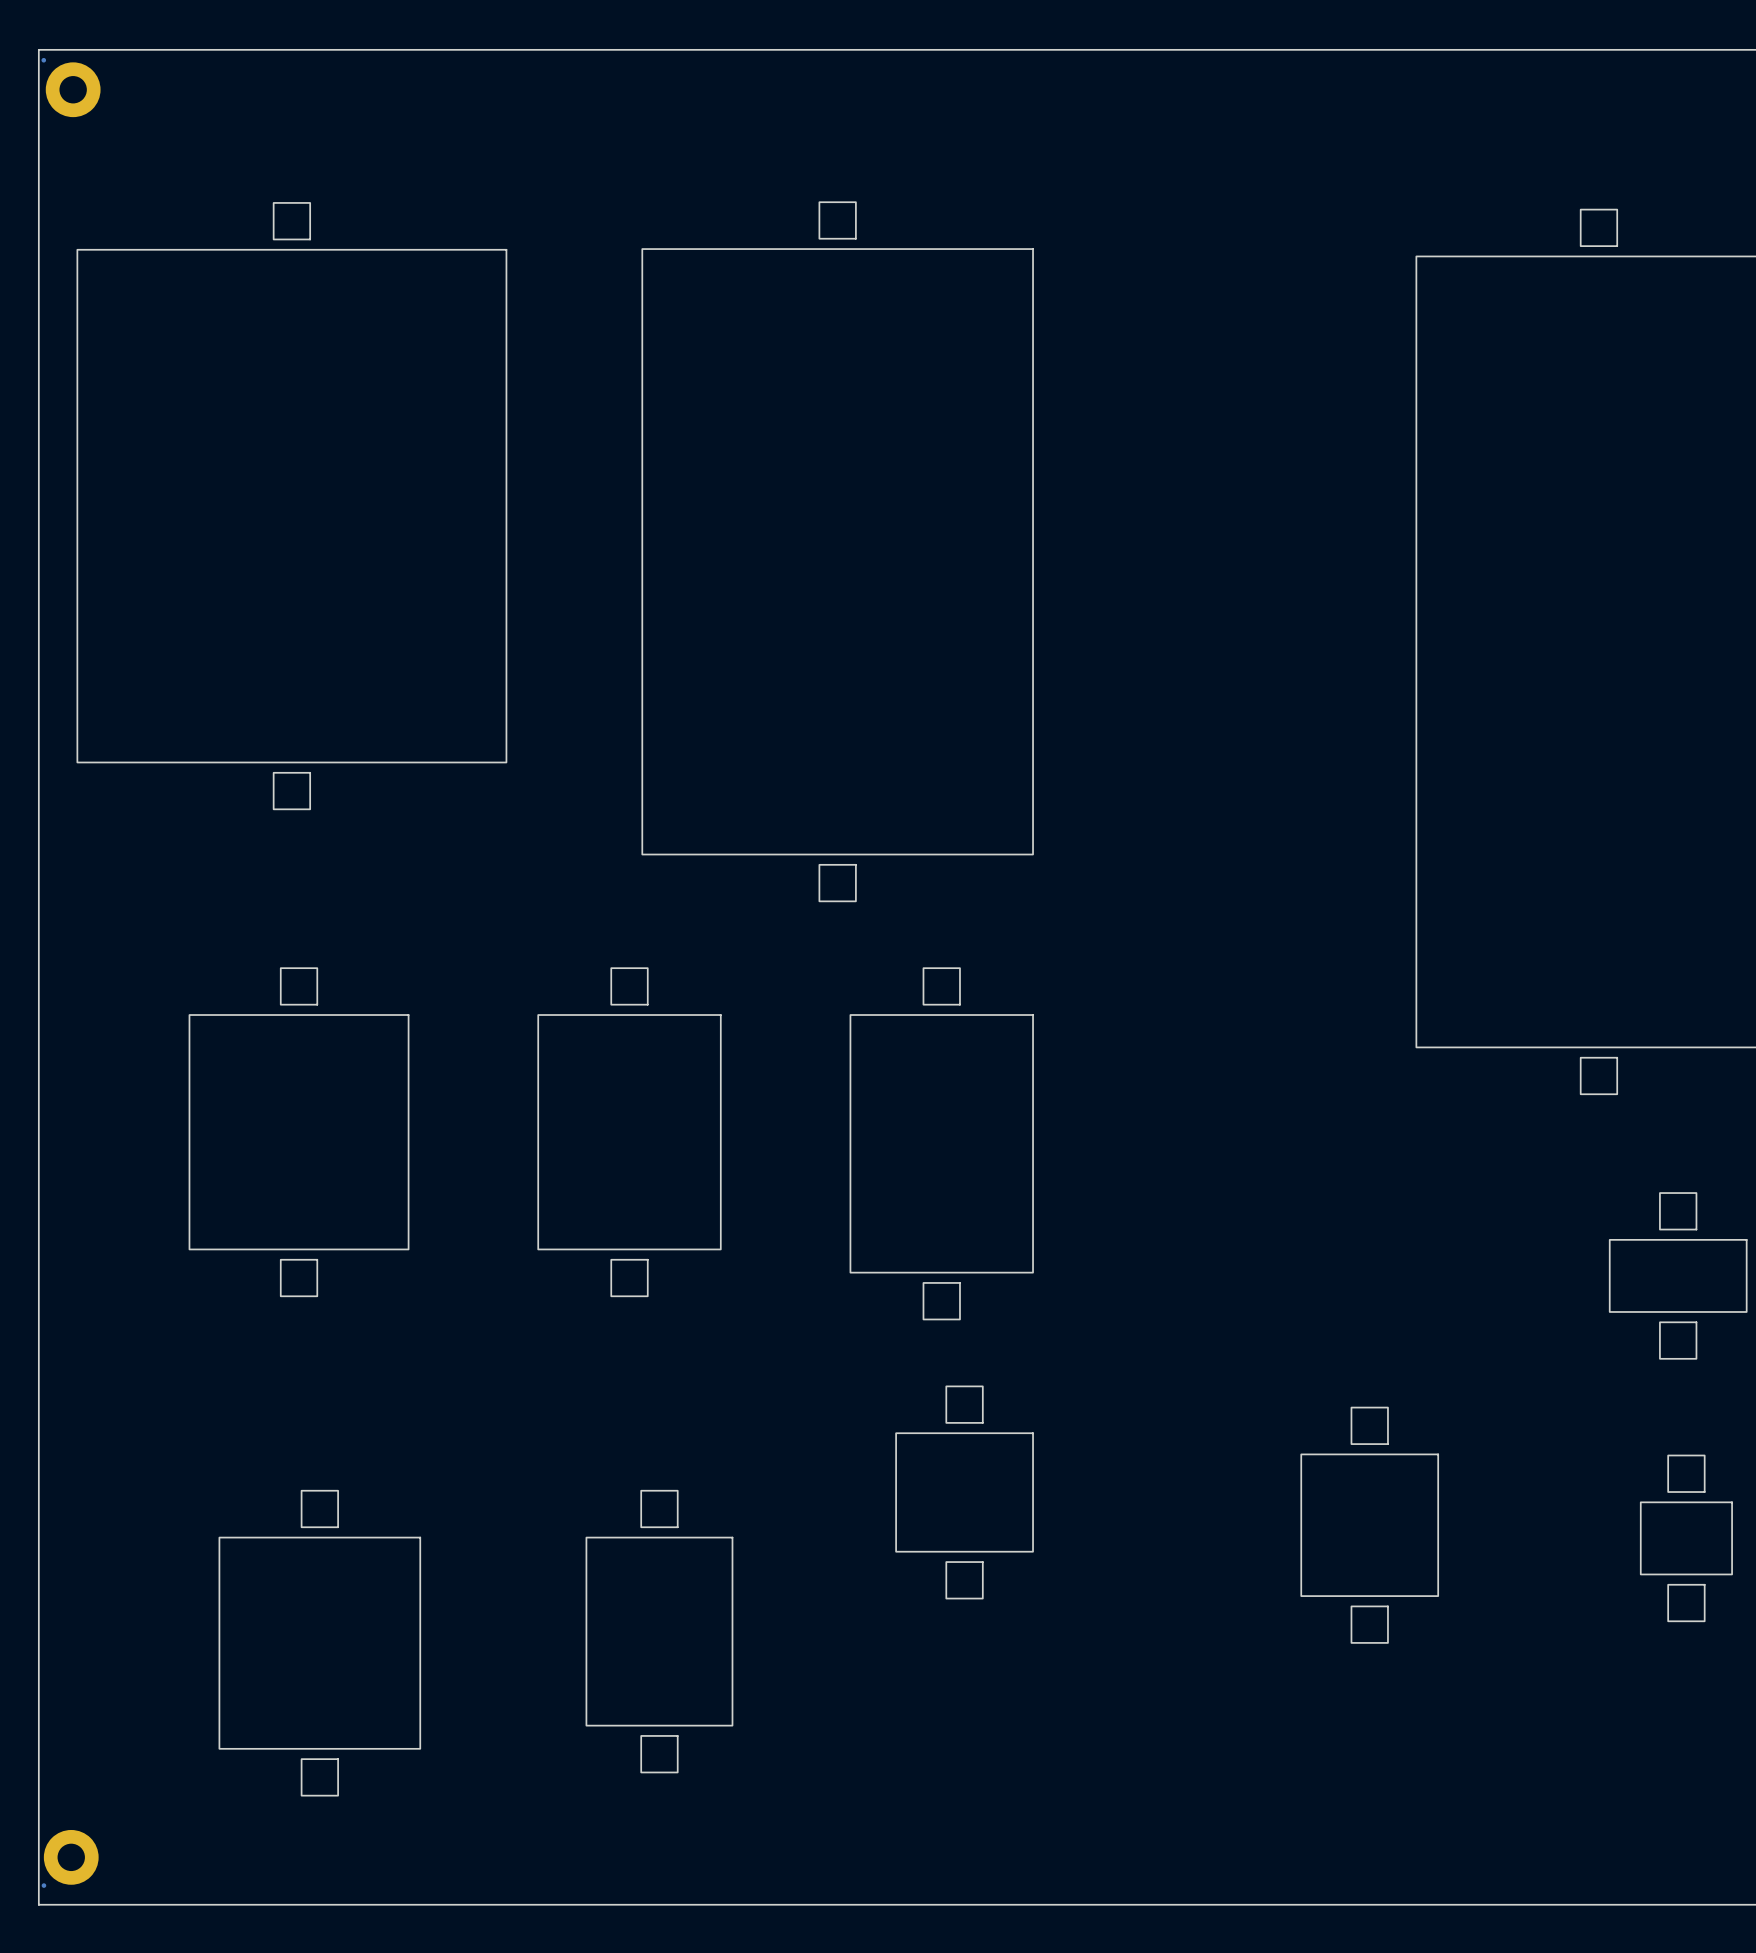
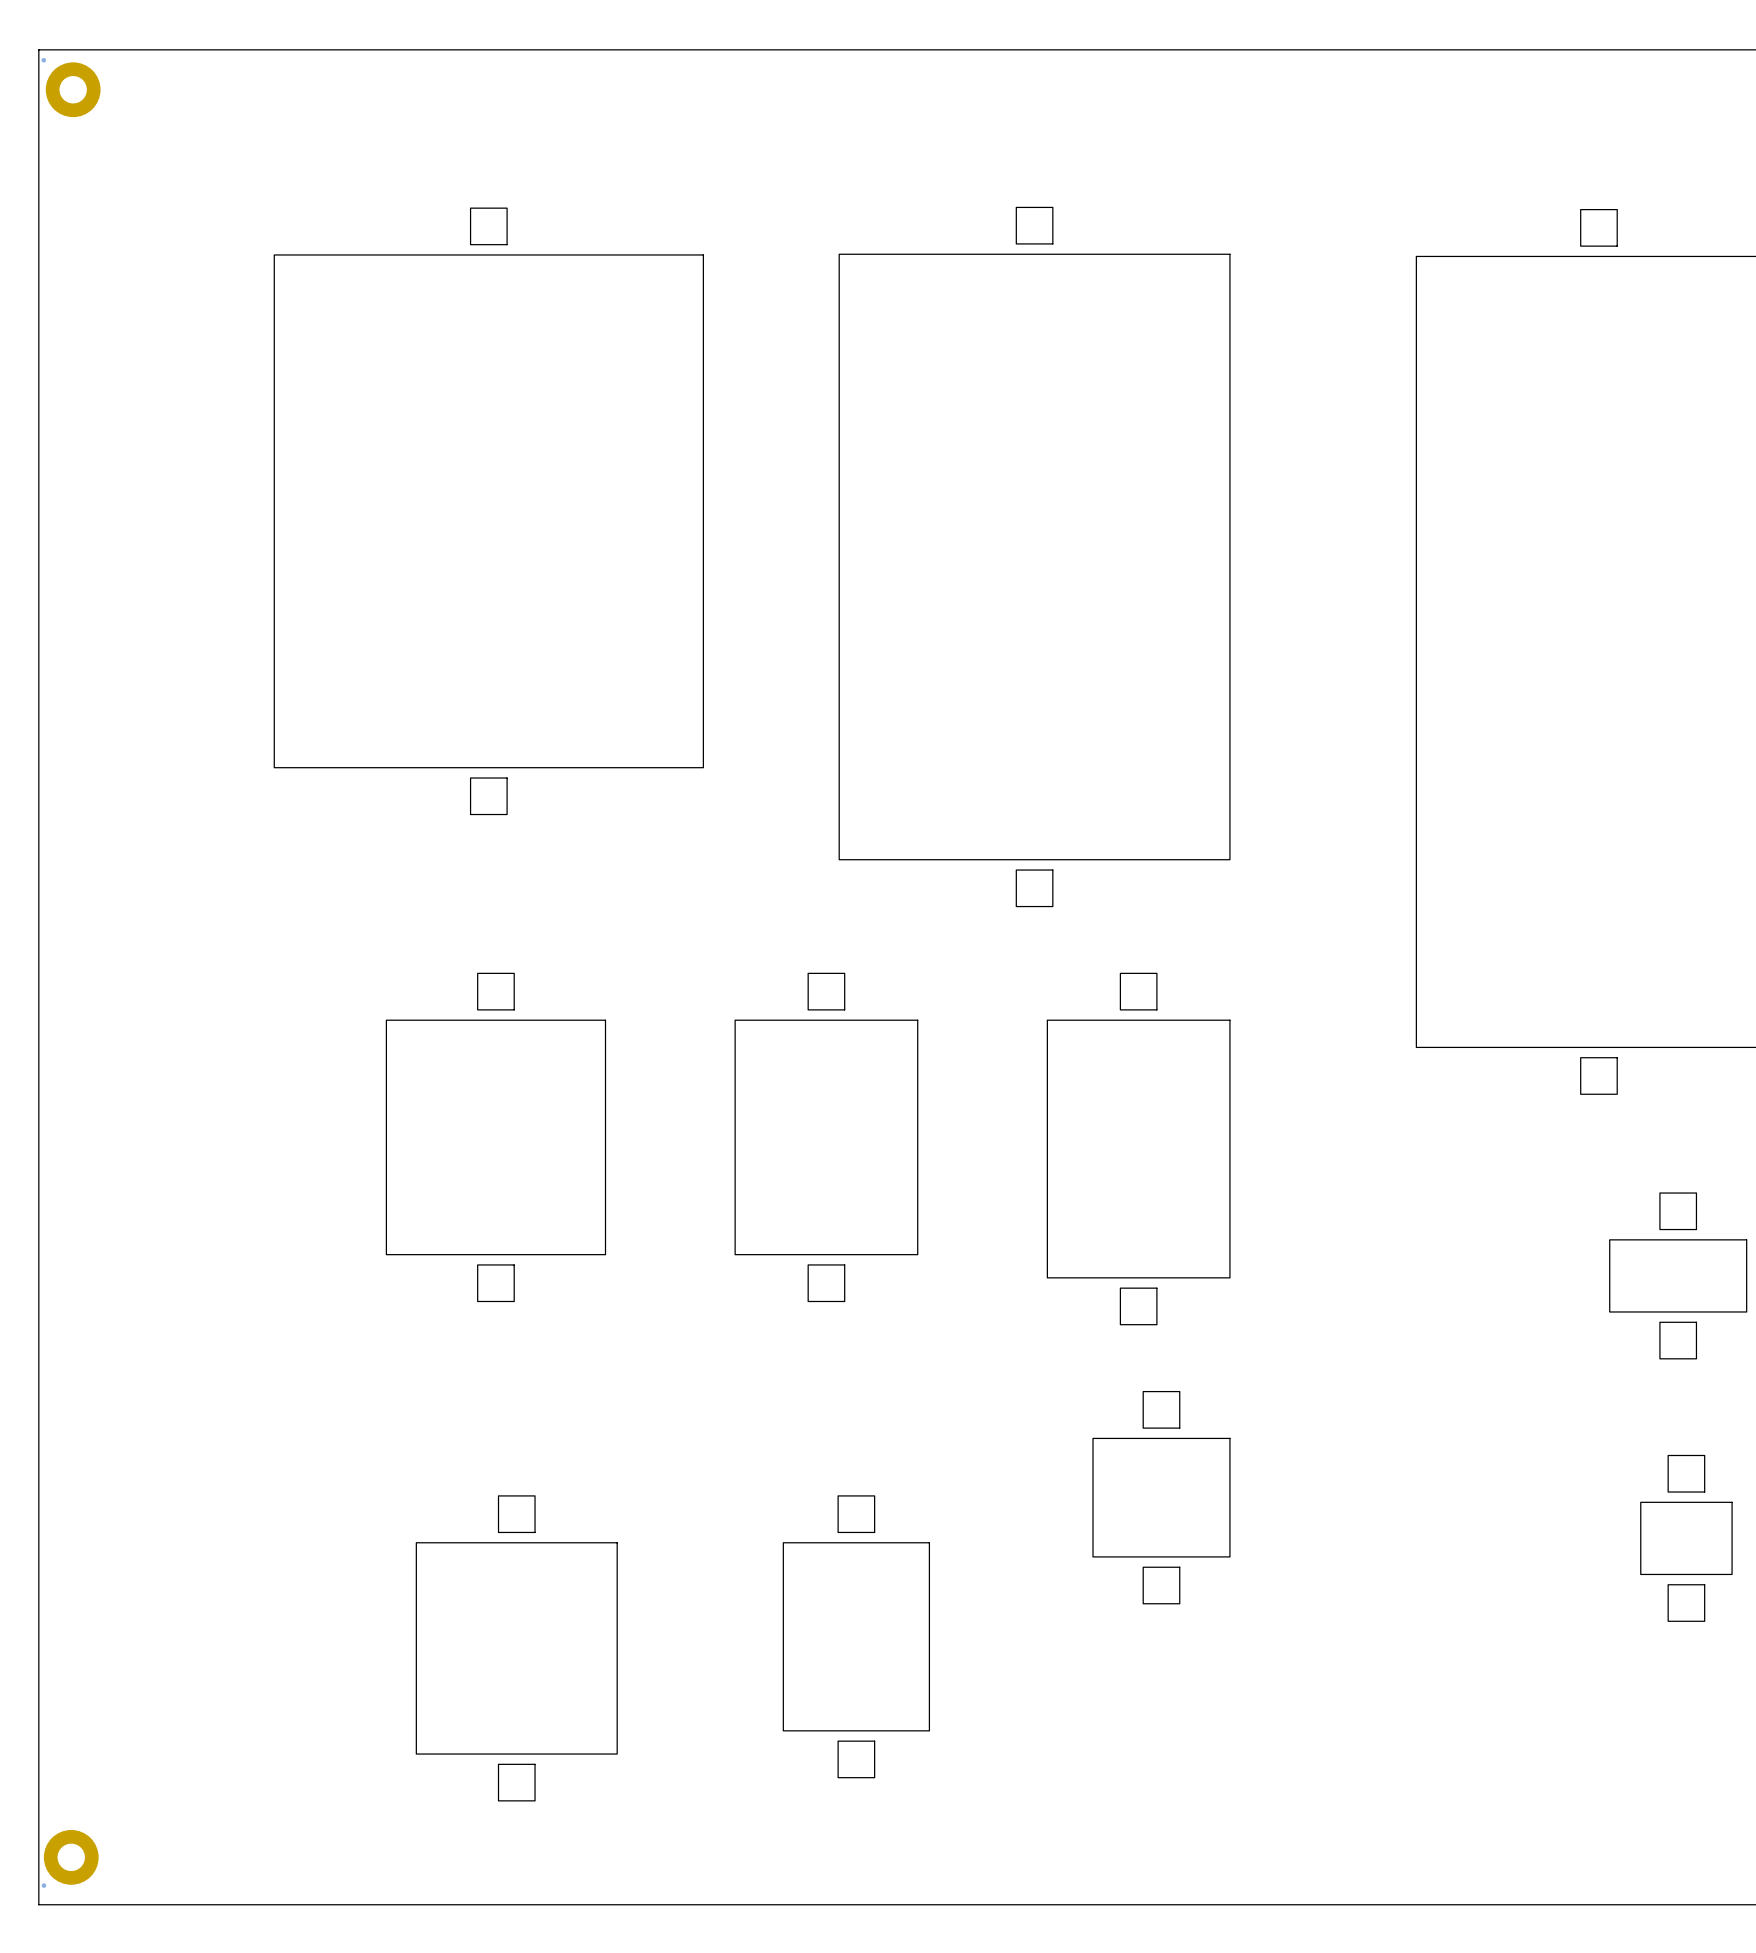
part position: (291, 506) -> (488, 511)
part position: (837, 551) -> (1034, 556)
part position: (299, 1132) -> (495, 1137)
part position: (629, 1132) -> (826, 1137)
part position: (941, 1143) -> (1138, 1149)
part position: (964, 1492) -> (1161, 1497)
part: (1369, 1525) -> none
part position: (659, 1631) -> (856, 1636)
part position: (319, 1643) -> (516, 1648)

